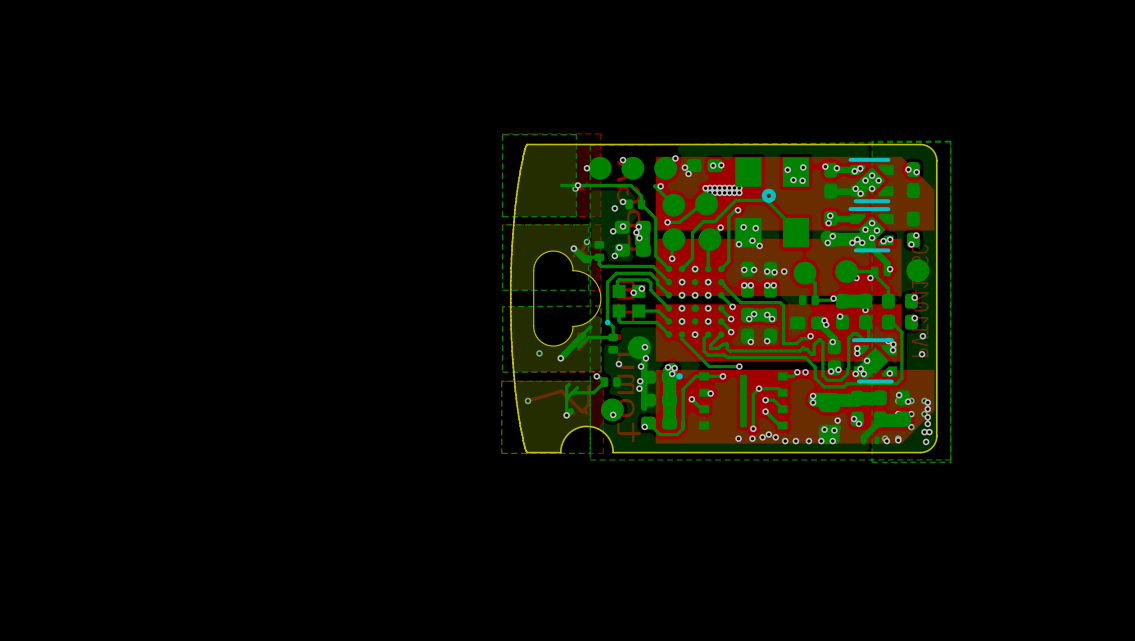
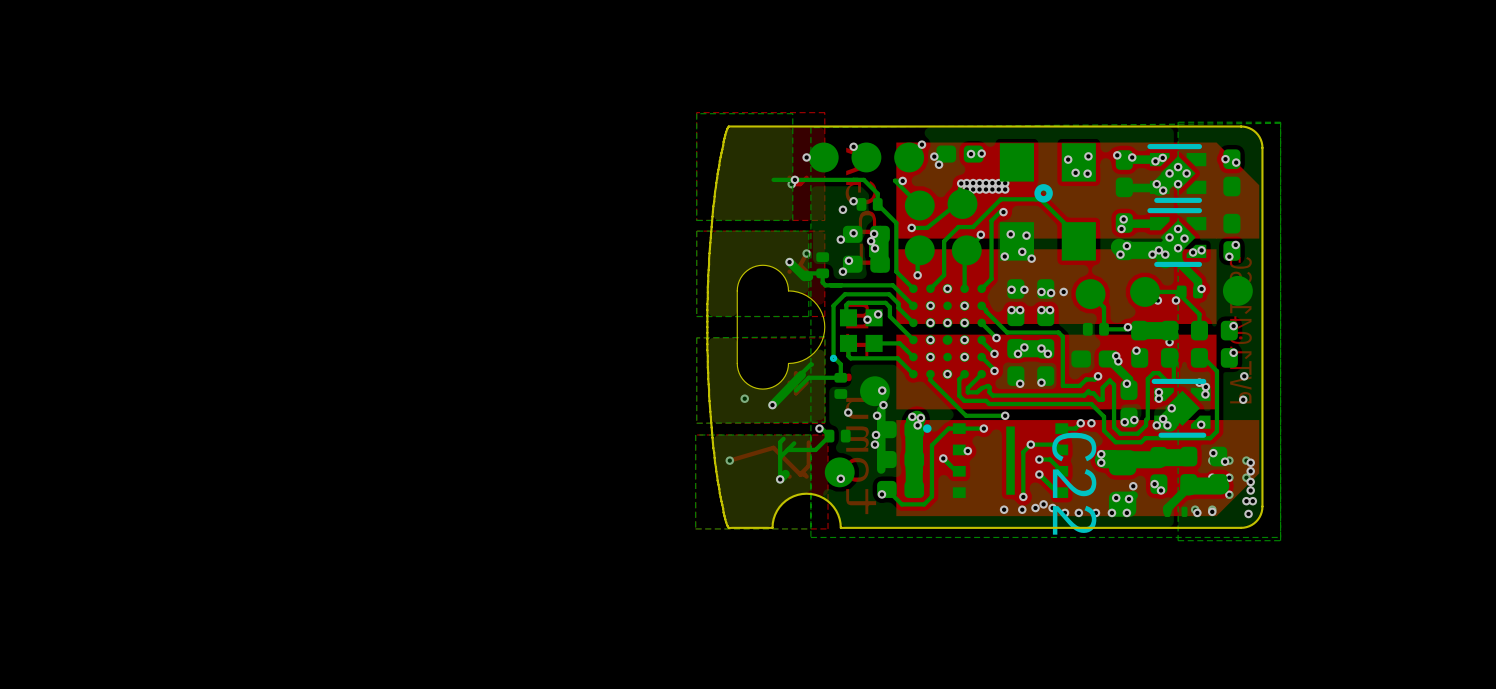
C22 name: none -> C22 (1074, 483)

